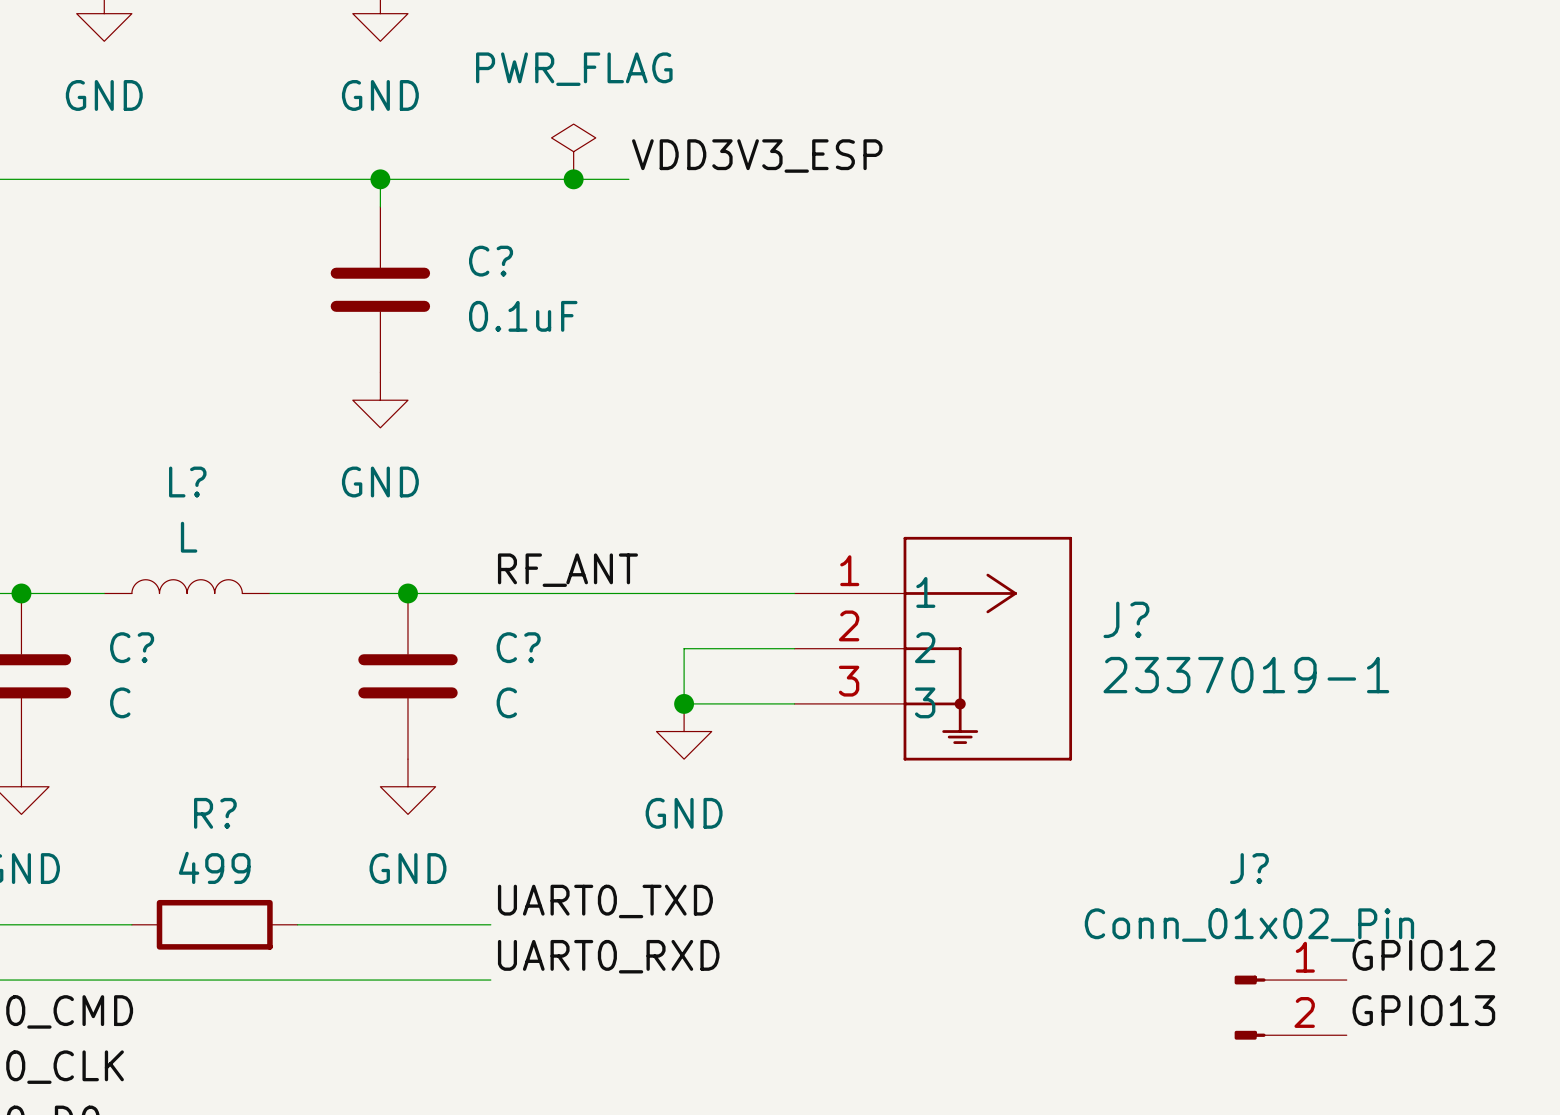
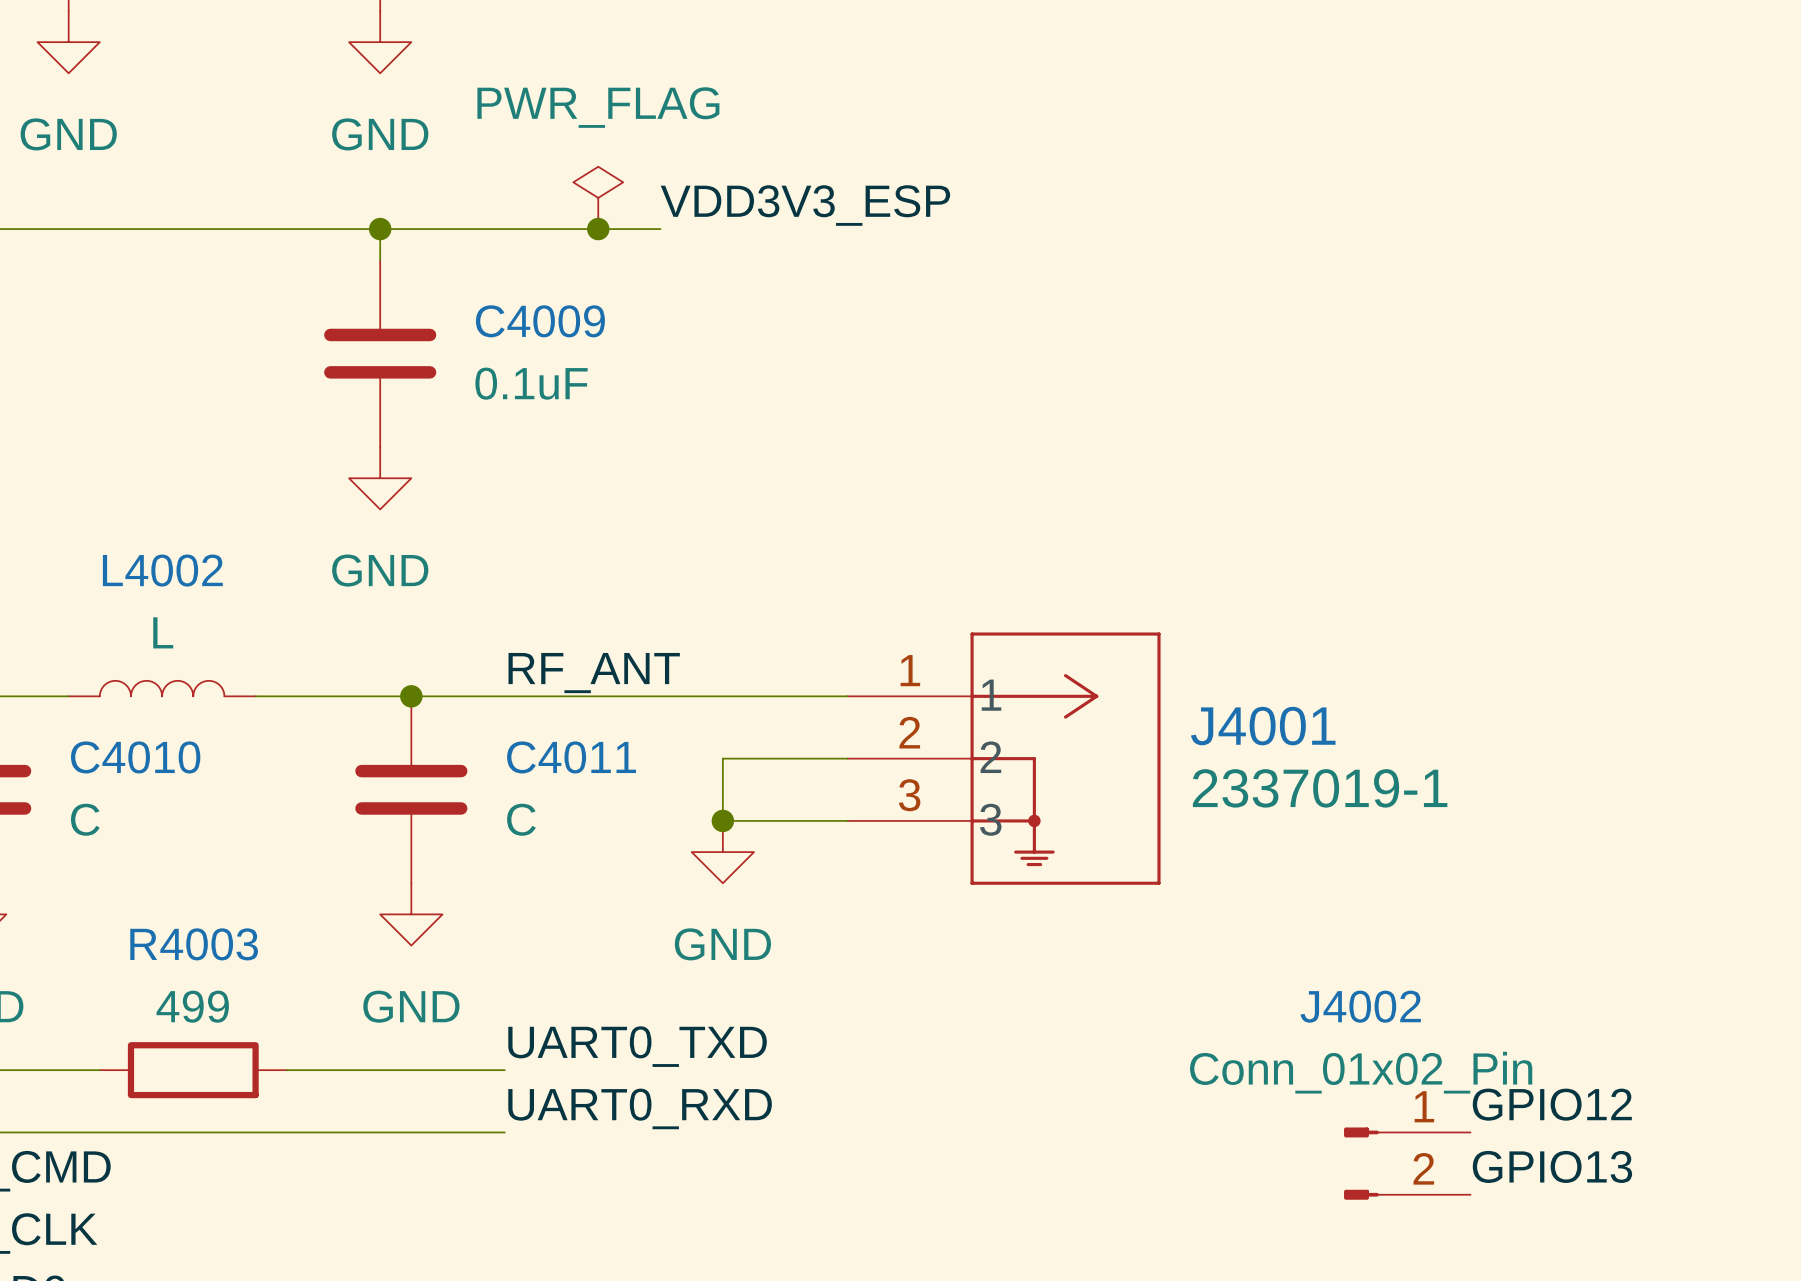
C? name: C? (491, 261) -> C4009 (540, 321)
L? name: L? (187, 482) -> L4002 (162, 570)
J? name: J? (1126, 619) -> J4001 (1263, 726)
C? name: C? (132, 647) -> C4010 (135, 757)
C? name: C? (518, 647) -> C4011 (571, 757)
R? name: R? (215, 813) -> R4003 (194, 944)
J? name: J? (1249, 868) -> J4002 (1360, 1006)

